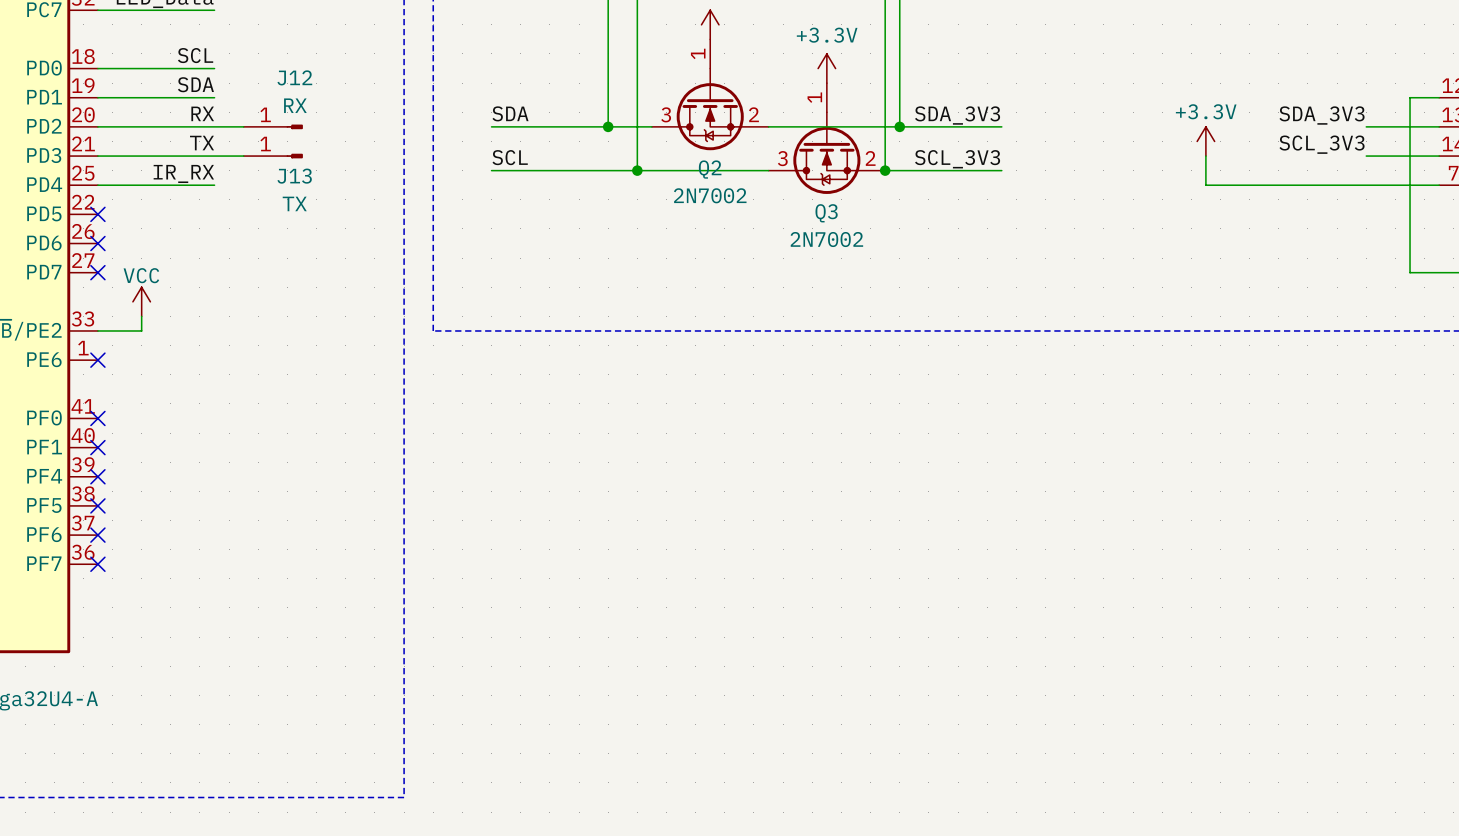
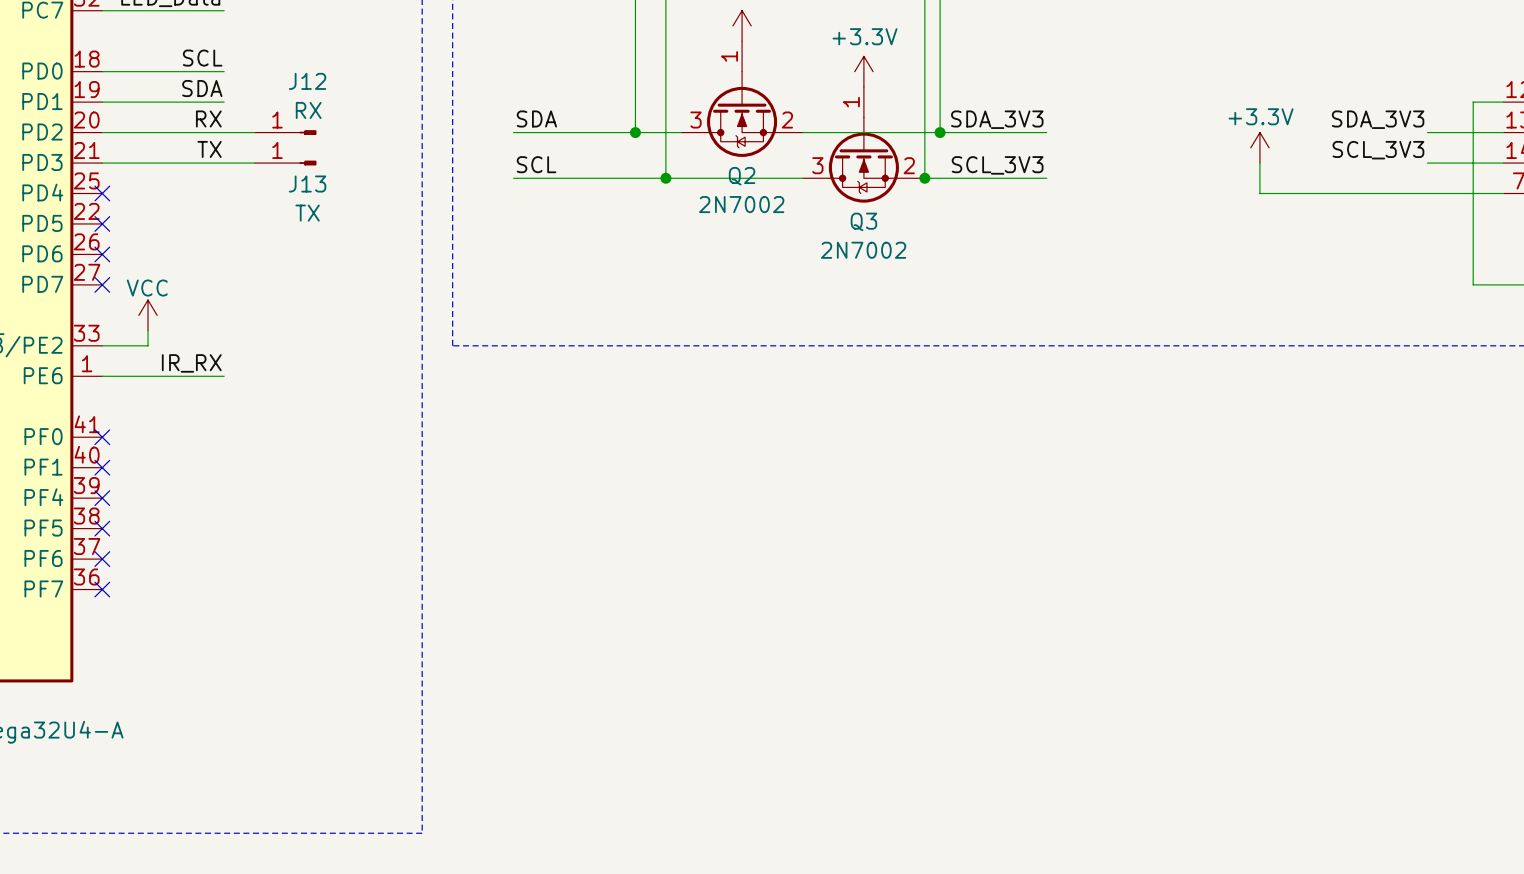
label position: IR_RX (183, 173) -> IR_RX (191, 363)
wire: (97, 185) (214, 185) -> (102, 376) (224, 376)
no-connect mark: none -> (102, 193)
no-connect mark: (97, 360) -> none

